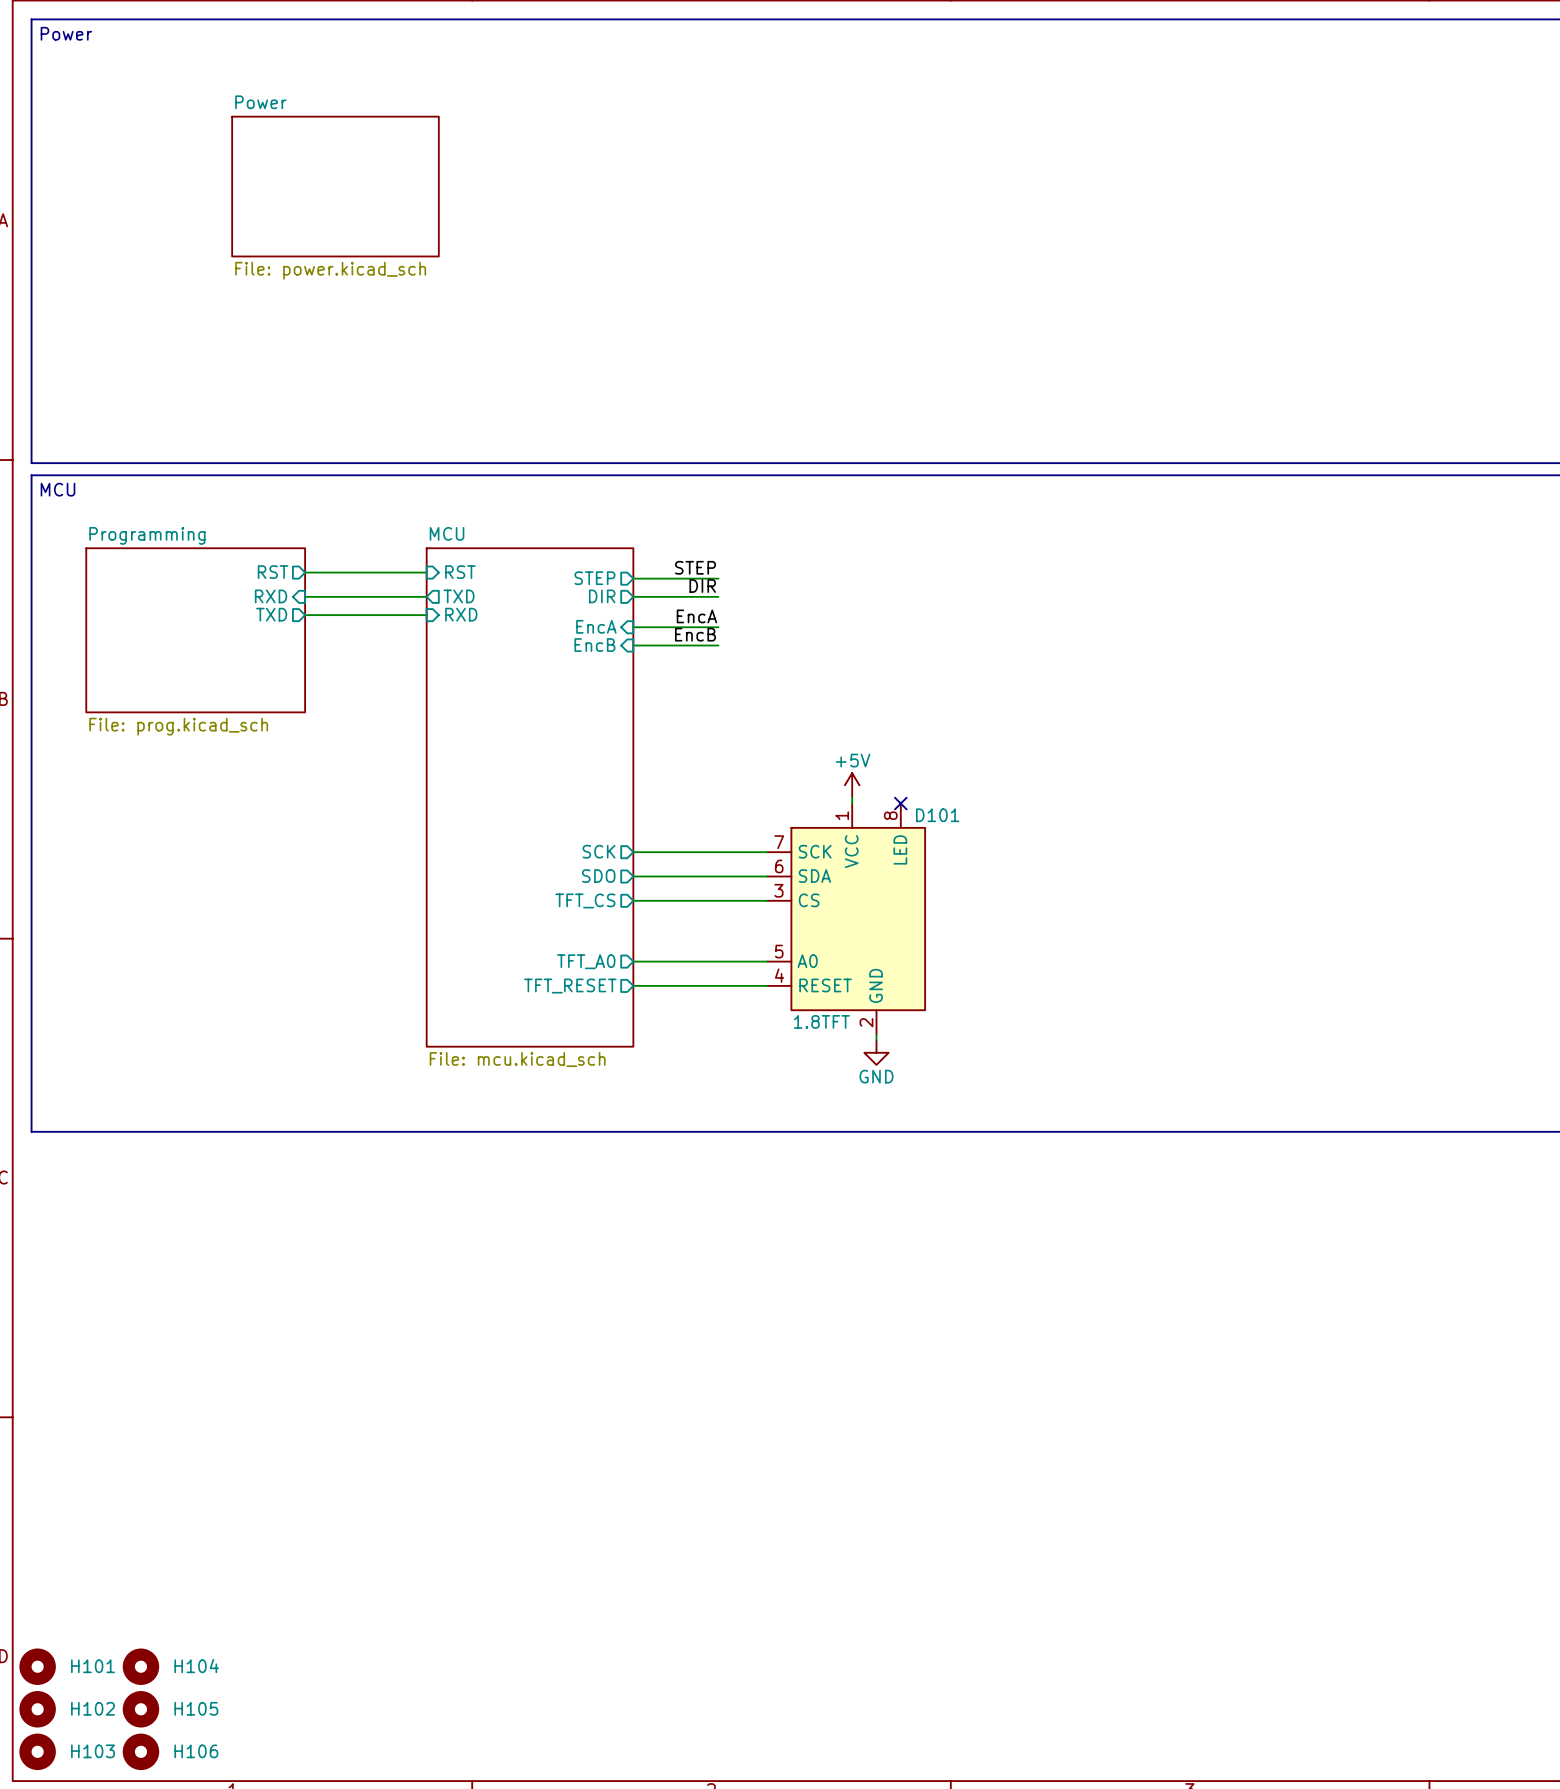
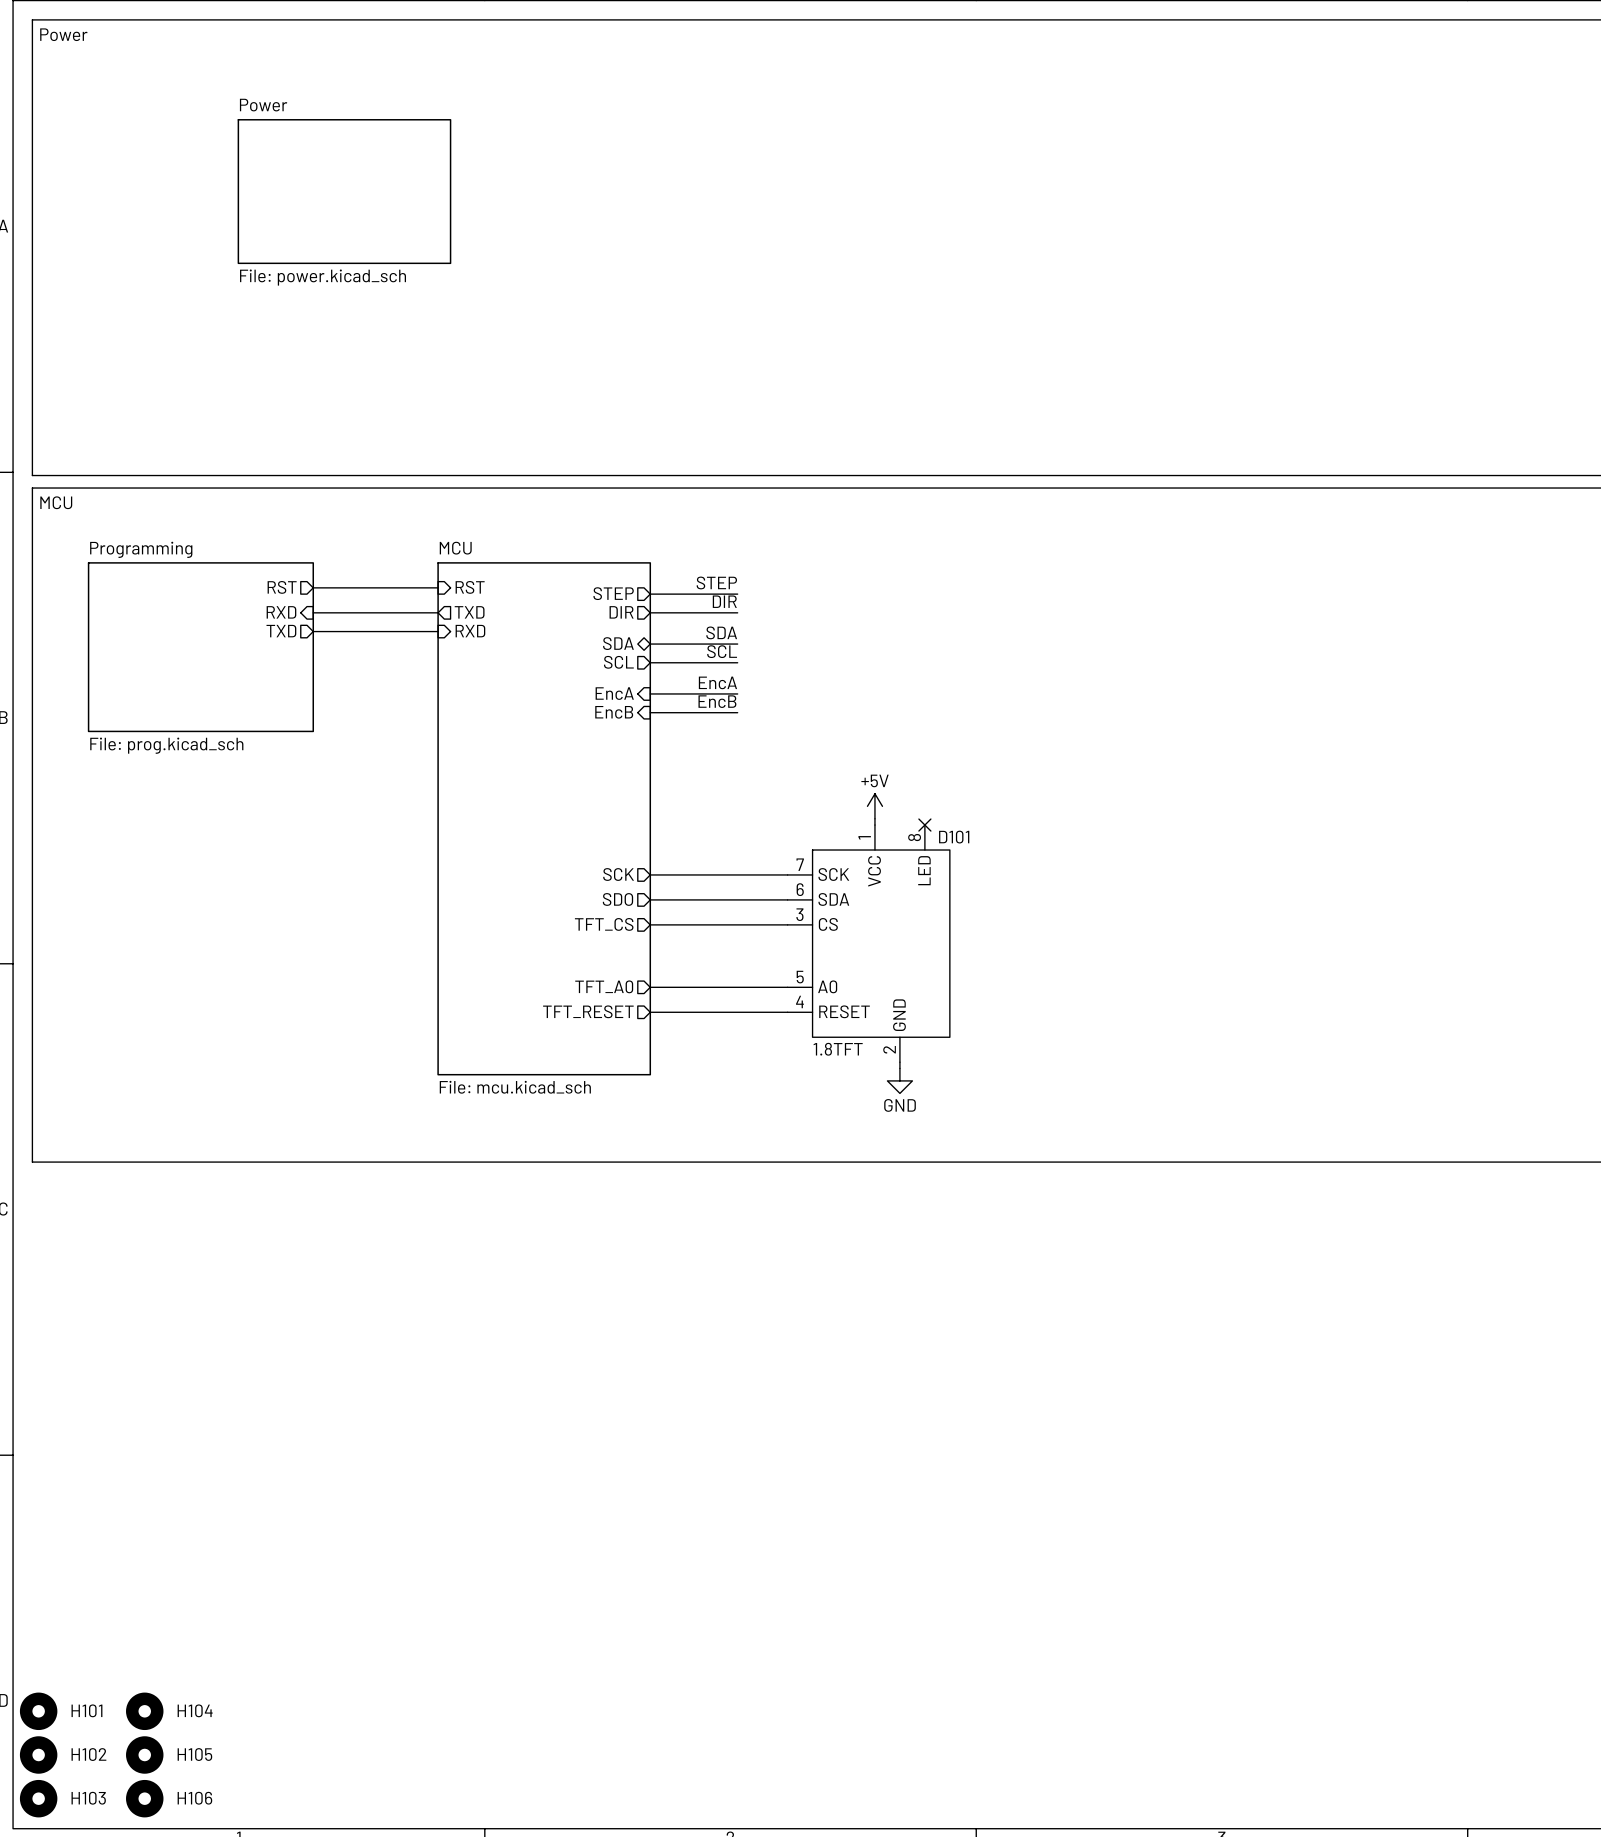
label: EncA (696, 616) -> SDA (721, 632)
sheet pin shape: input (596, 626) -> bidirectional (618, 643)
sheet pin: EncA (596, 626) -> SDA (618, 643)
label: EncB (695, 634) -> SCL (722, 651)
sheet pin shape: input (594, 645) -> output (618, 662)
sheet pin: EncB (594, 645) -> SCL (618, 662)
label: none -> EncA (717, 682)
sheet pin: none -> EncA (614, 693)
wire: none -> (650, 693) (737, 693)
label: none -> EncB (717, 701)
sheet pin: none -> EncB (614, 712)
wire: none -> (650, 712) (737, 712)

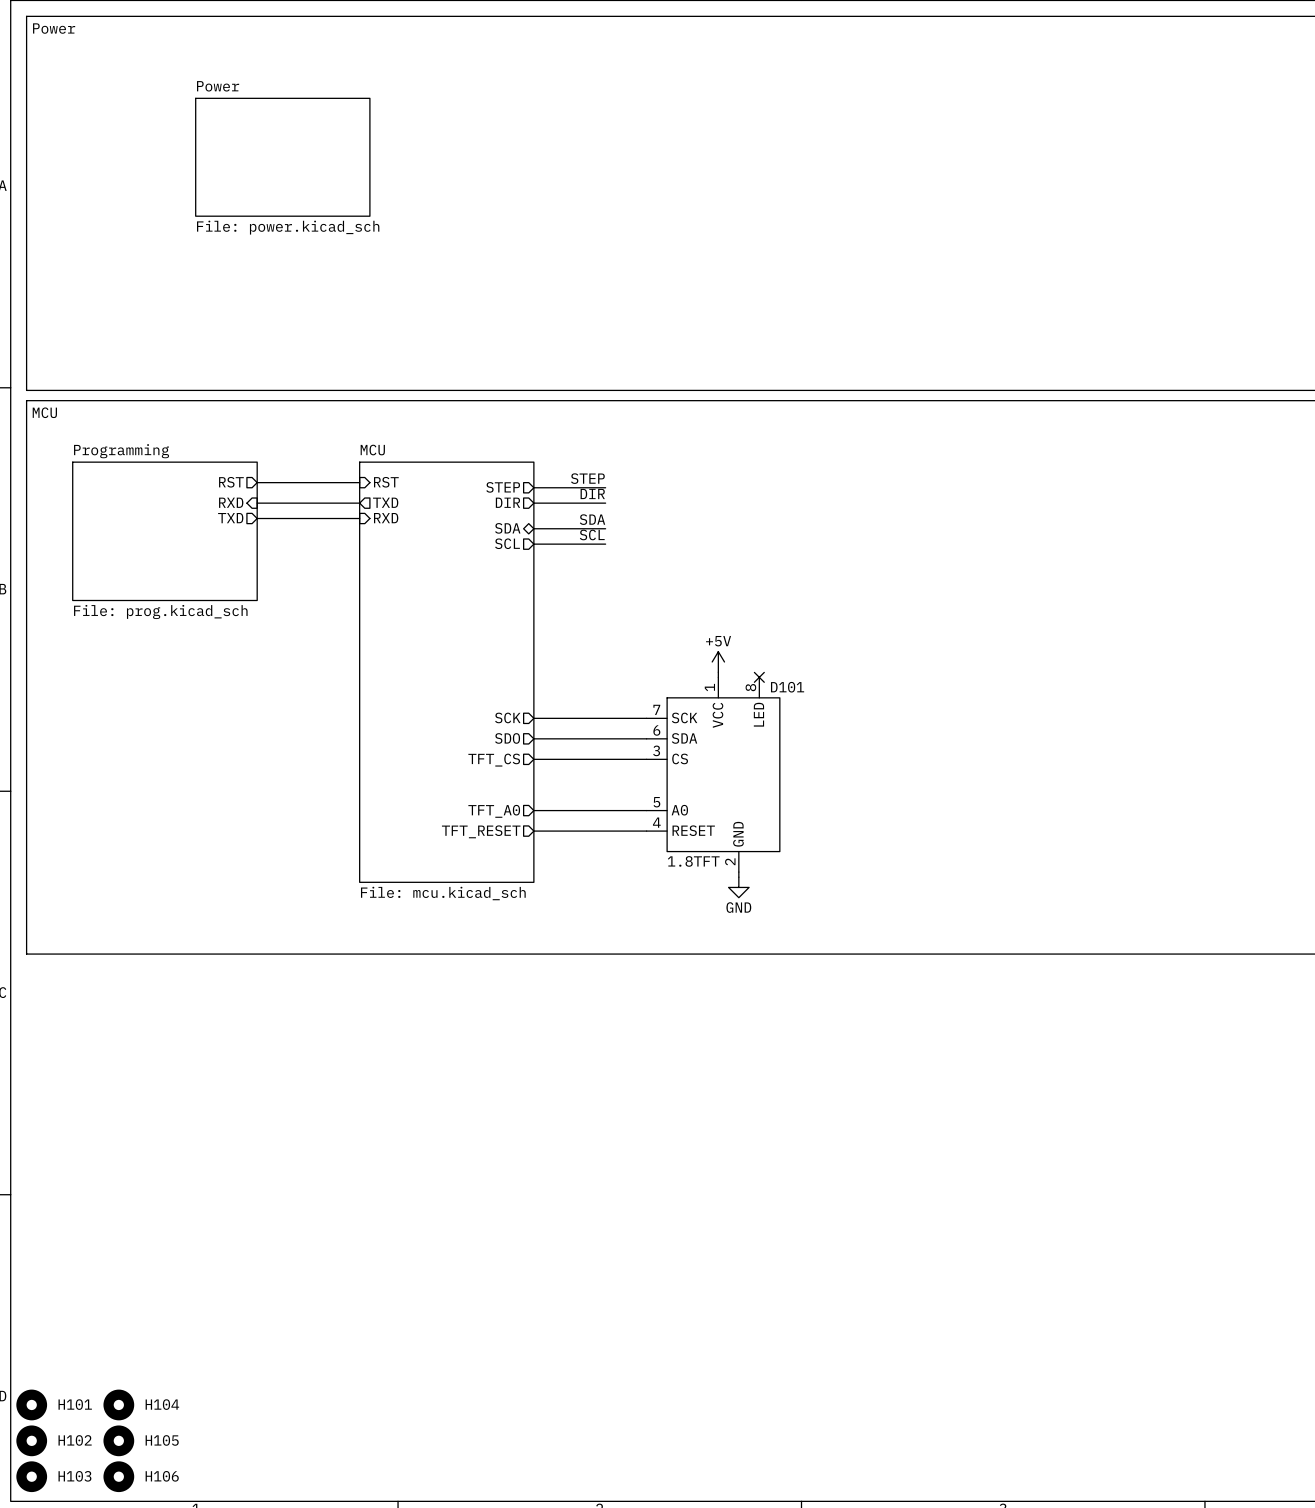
label: EncA (717, 682) -> none
sheet pin: EncA (614, 693) -> none
wire: (650, 693) (737, 693) -> none
label: EncB (717, 701) -> none
sheet pin: EncB (614, 712) -> none
wire: (650, 712) (737, 712) -> none

